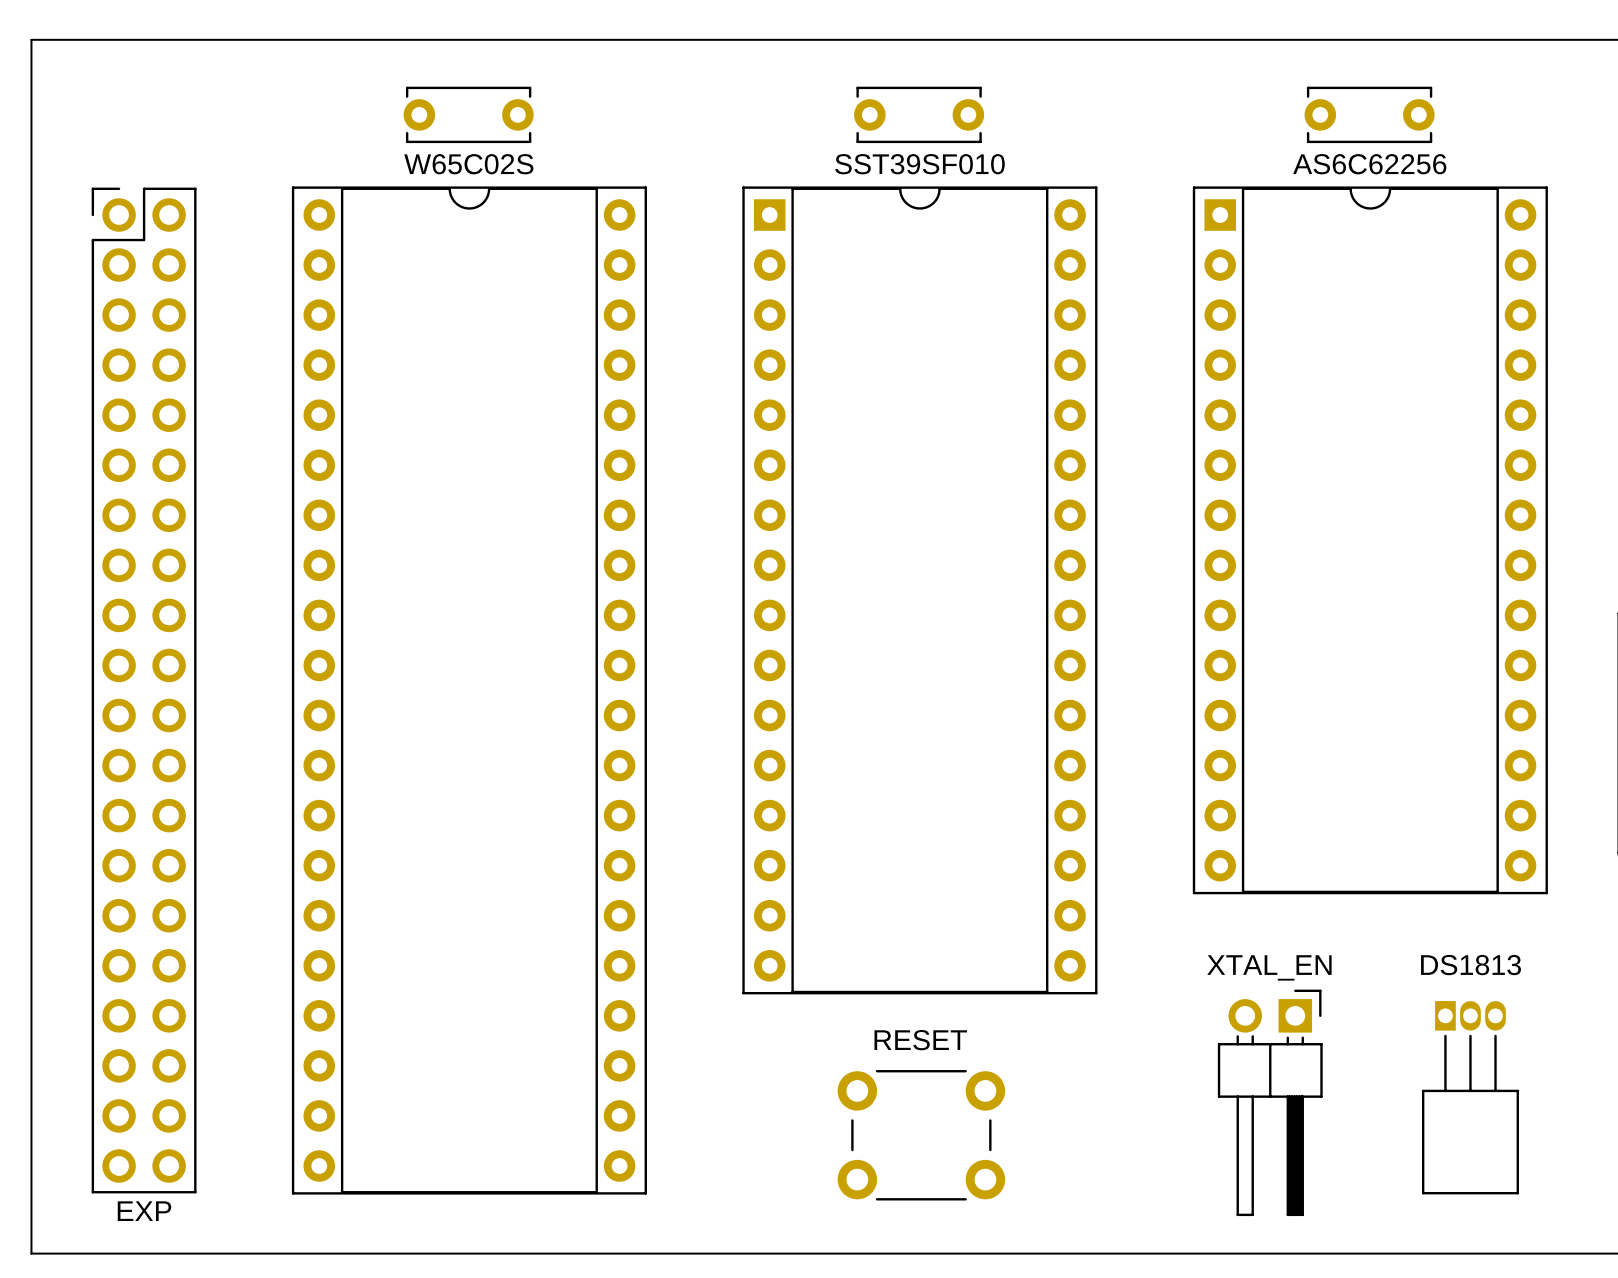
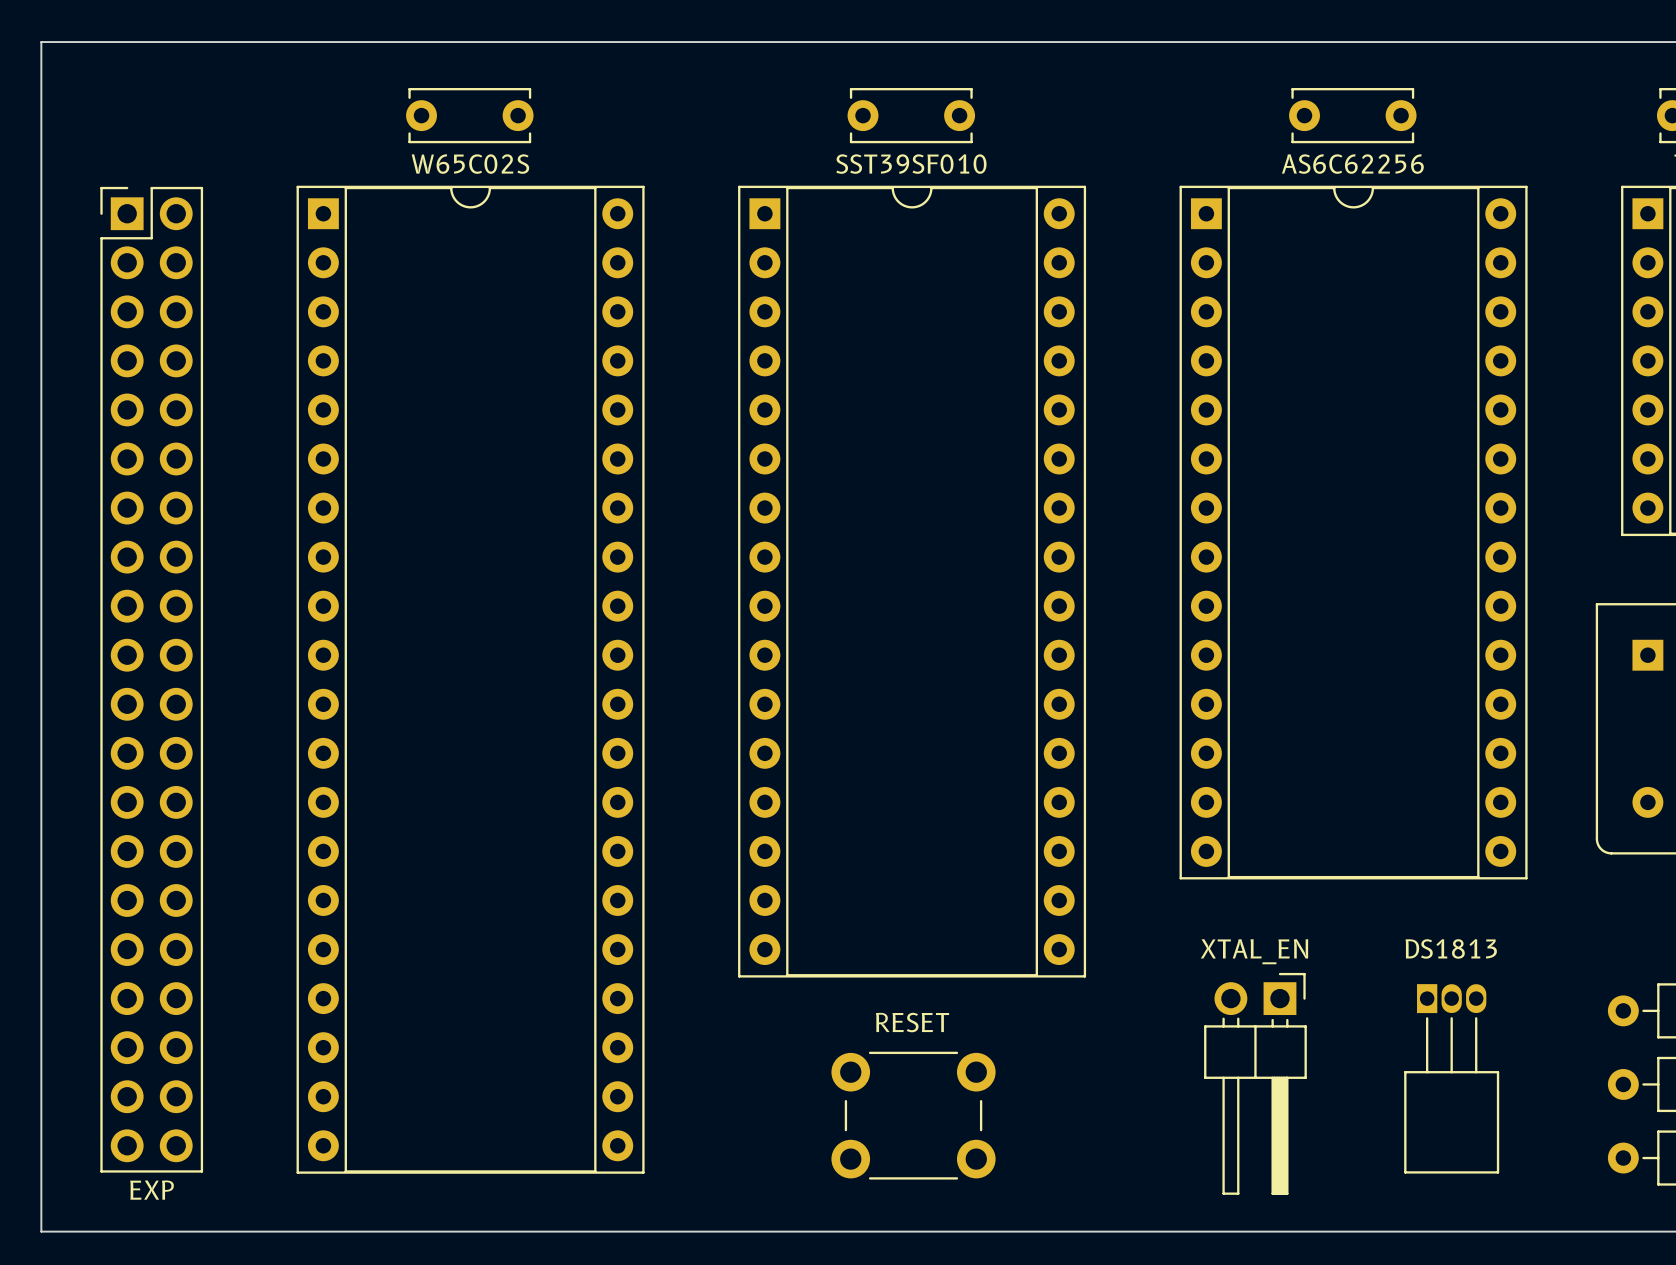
part footprint: [291, 186, 647, 1195] -> [296, 185, 645, 1174]
part footprint: [91, 187, 197, 1194] -> [100, 186, 204, 1173]

